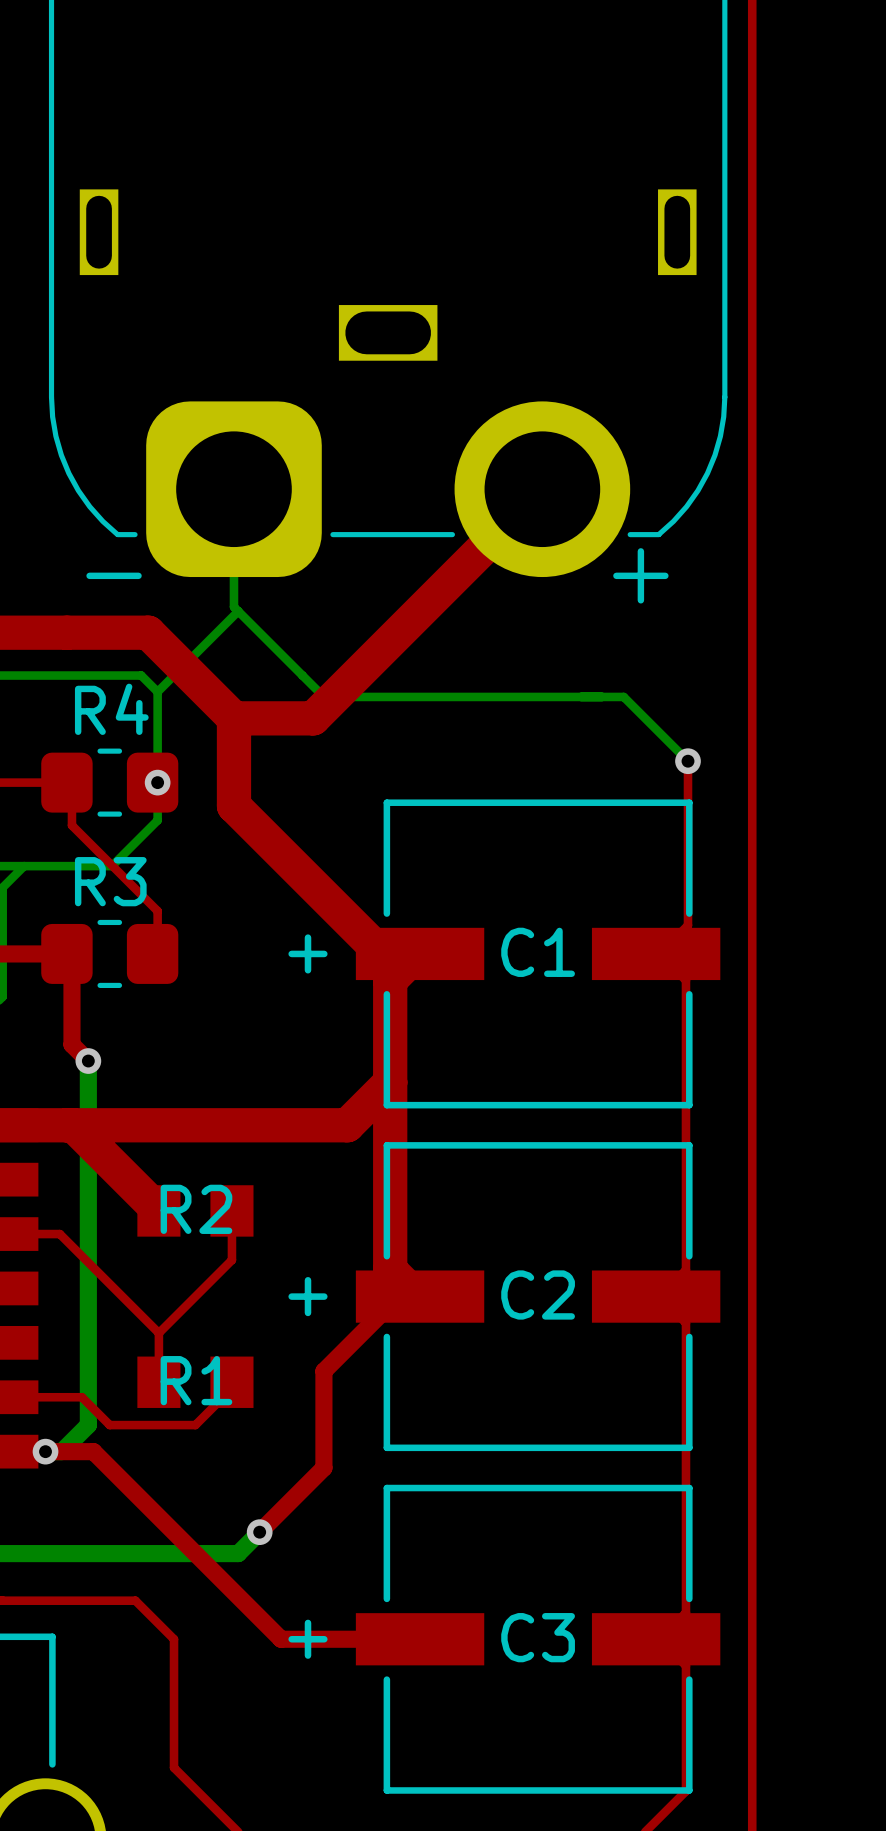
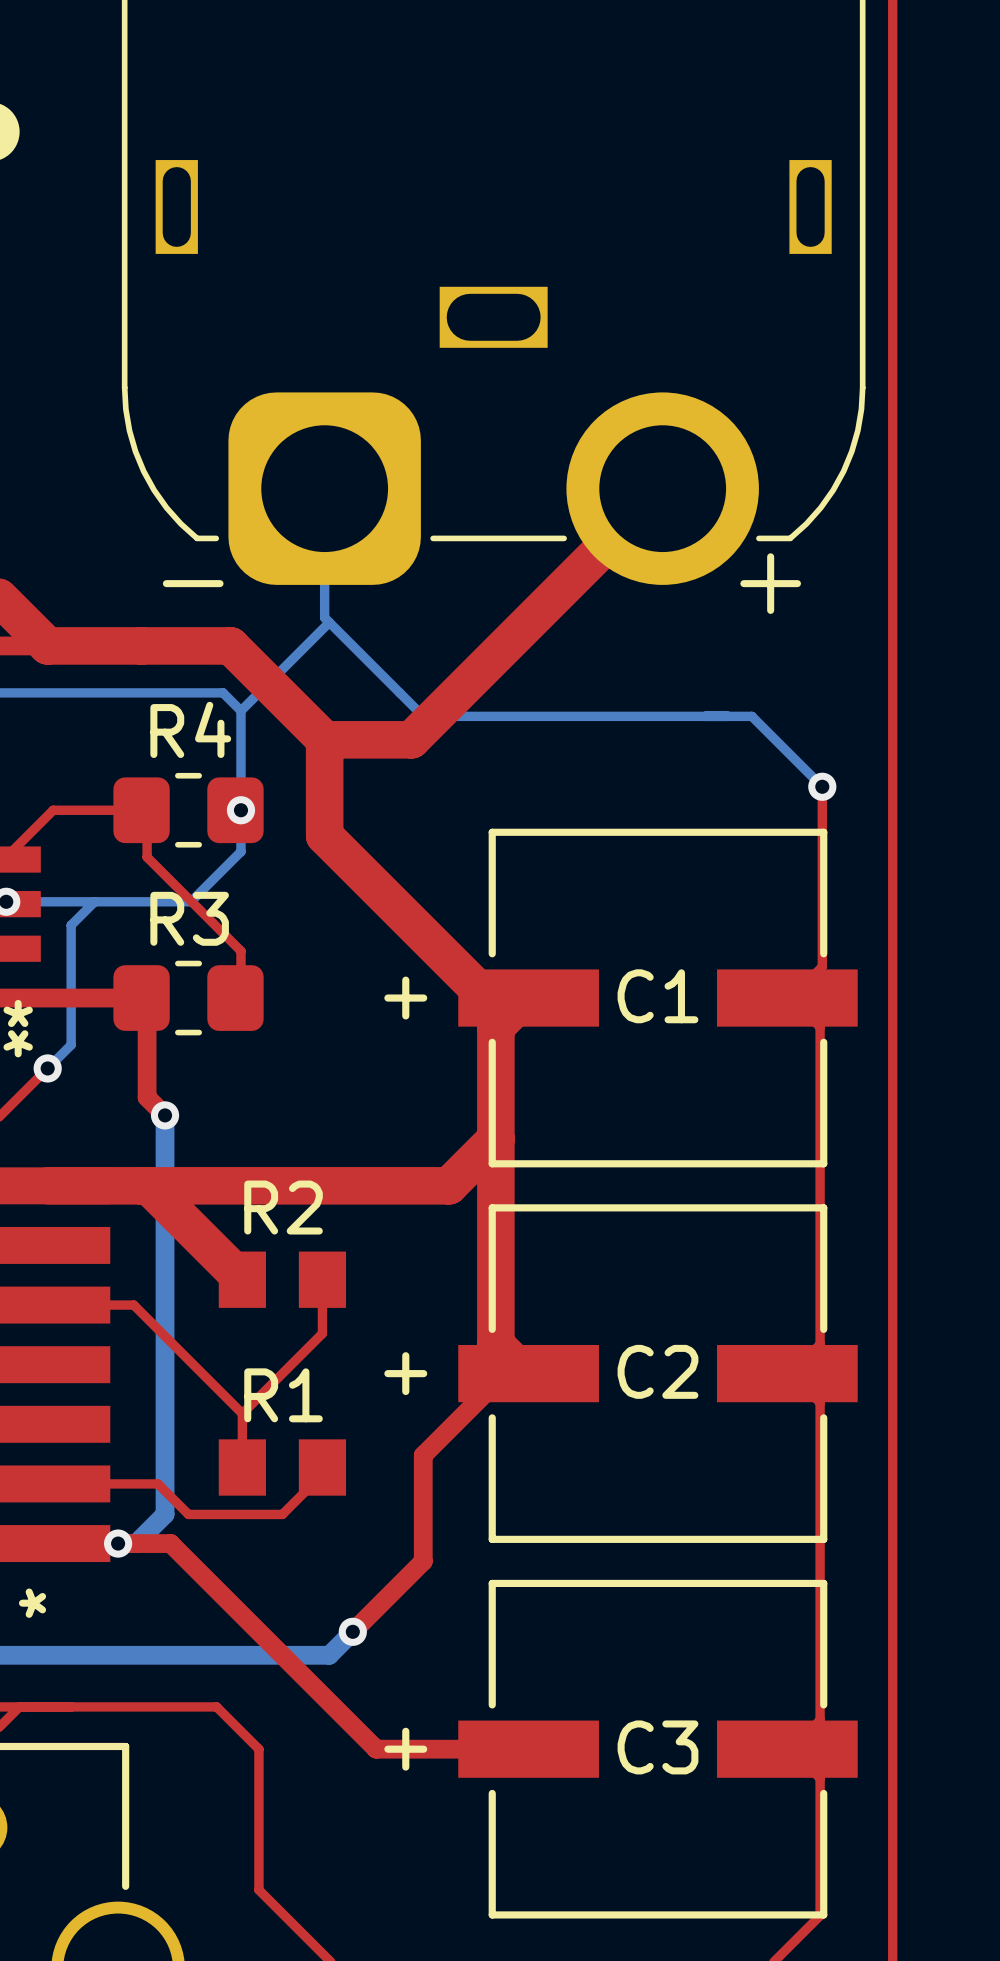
R2 name position: R2 (196, 1209) -> R2 (283, 1207)
R1 name position: R1 (196, 1380) -> R1 (283, 1395)

